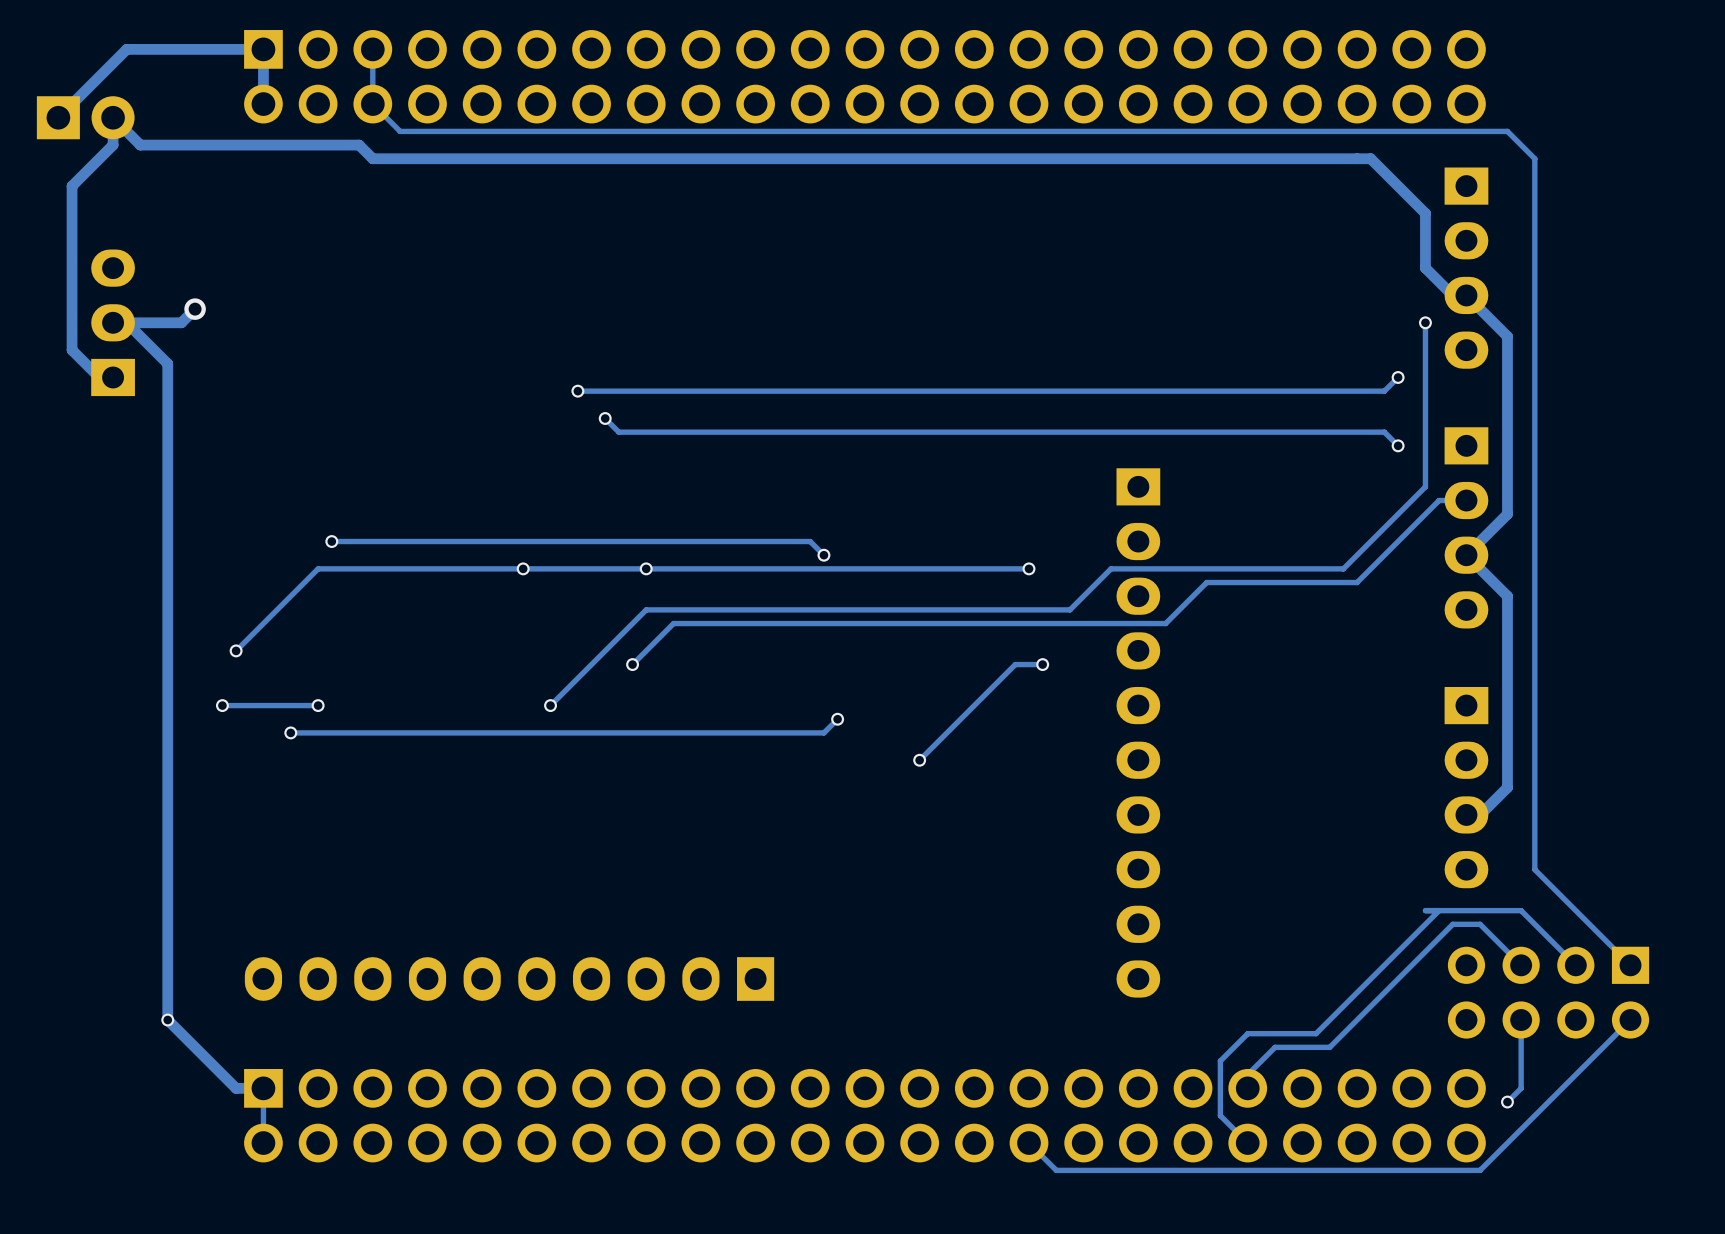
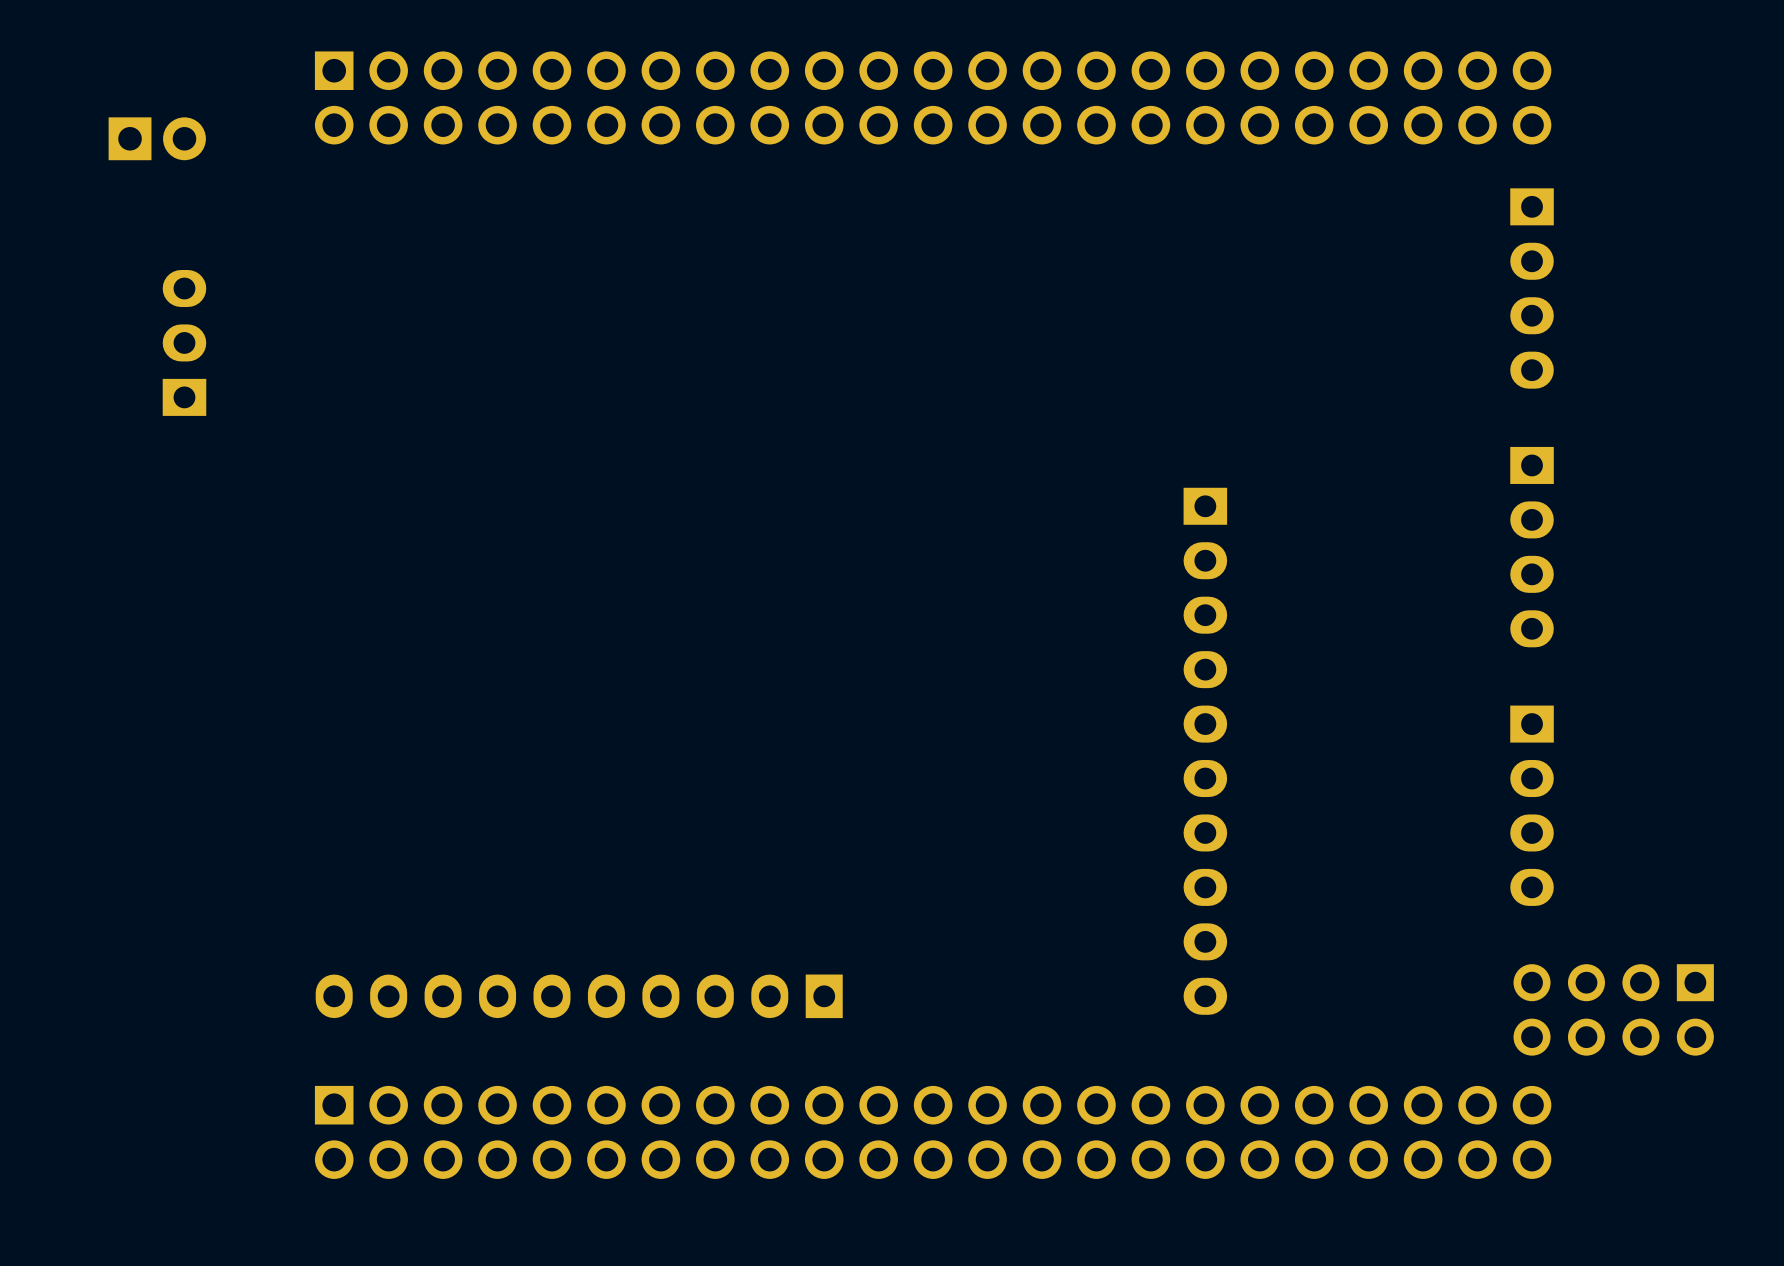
track: (372, 49) (372, 104) (400, 131) (1507, 131) (1534, 158) (1534, 869) (1630, 965) -> none
track: (263, 104) (263, 49) (126, 49) (58, 117) -> none
track: (1466, 295) (1452, 295) (1425, 268) (1425, 213) (1370, 158) (372, 158) (359, 145) (140, 145) (113, 117) (113, 145) (72, 186) (72, 350) (99, 377) (113, 377) -> none
track: (1466, 295) (1507, 336) (1507, 514) (1466, 555) (1507, 596) (1507, 787) (1480, 814) (1466, 814) -> none
track: (195, 309) (181, 322) (126, 322) (167, 363) (167, 1020) (236, 1088) (263, 1088) (263, 1143) -> none
via: (195, 309) -> none
track: (1425, 322) (1425, 486) (1343, 568) (1111, 568) (1070, 609) (646, 609) (550, 705) -> none
via: (1425, 322) -> none
track: (1398, 377) (1384, 391) (577, 391) -> none
via: (1398, 377) -> none
via: (577, 391) -> none
track: (605, 418) (618, 432) (1384, 432) (1398, 445) -> none
via: (605, 418) -> none
via: (1398, 445) -> none
track: (1466, 500) (1439, 500) (1357, 582) (1206, 582) (1165, 623) (673, 623) (632, 664) -> none
track: (331, 541) (810, 541) (823, 555) -> none
via: (331, 541) -> none
via: (823, 555) -> none
via: (523, 568) -> none
via: (646, 568) -> none
track: (1029, 568) (318, 568) (236, 650) -> none
via: (1029, 568) -> none
via: (236, 650) -> none
via: (632, 664) -> none
track: (1042, 664) (1015, 664) (919, 760) -> none
via: (1042, 664) -> none
via: (222, 705) -> none
track: (318, 705) (222, 705) -> none
via: (318, 705) -> none
via: (550, 705) -> none
track: (837, 719) (823, 732) (290, 732) -> none
via: (837, 719) -> none
via: (290, 732) -> none
via: (919, 760) -> none
track: (1425, 910) (1521, 910) (1575, 965) -> none
track: (1439, 910) (1316, 1033) (1247, 1033) (1220, 1061) (1220, 1115) (1247, 1143) -> none
track: (1521, 965) (1480, 924) (1452, 924) (1329, 1047) (1275, 1047) (1247, 1074) (1247, 1088) -> none
via: (167, 1020) -> none
track: (1521, 1020) (1521, 1088) (1507, 1102) -> none
track: (1630, 1020) (1480, 1170) (1056, 1170) (1029, 1143) -> none
via: (1507, 1102) -> none

